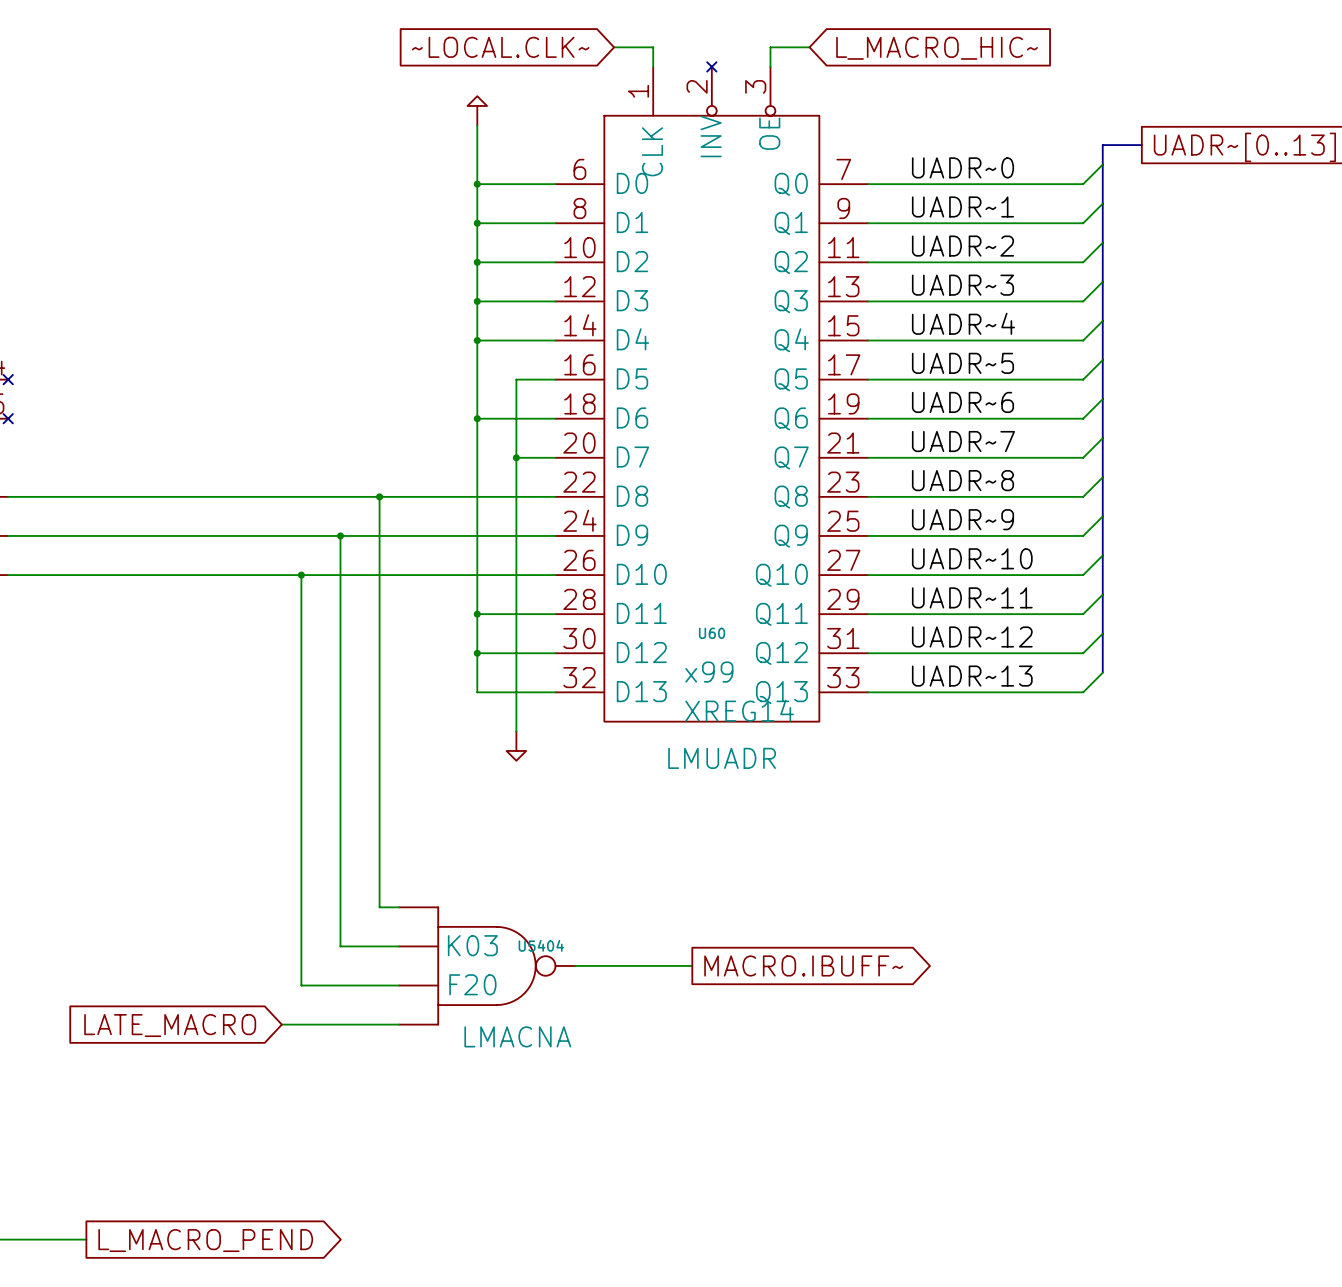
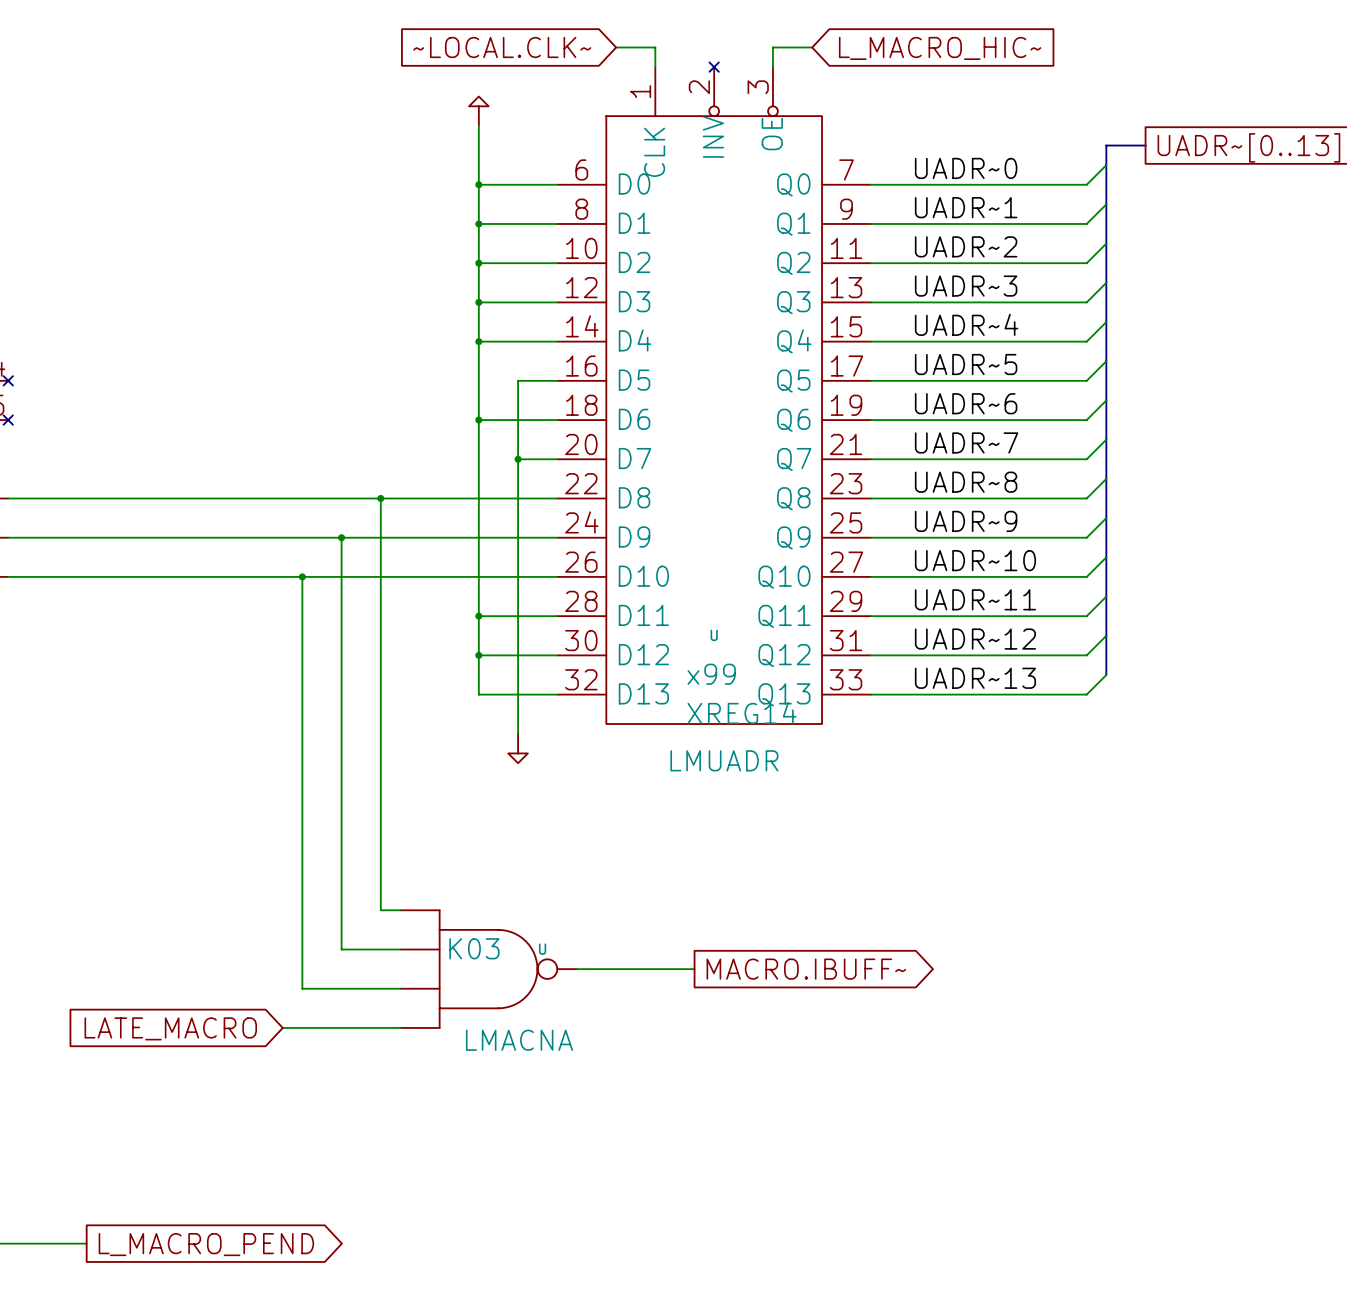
U60 name: U60 (712, 633) -> U (714, 635)
U5404 name: U5404 (541, 945) -> U (542, 949)
U5404 value: F20 (472, 984) -> none

